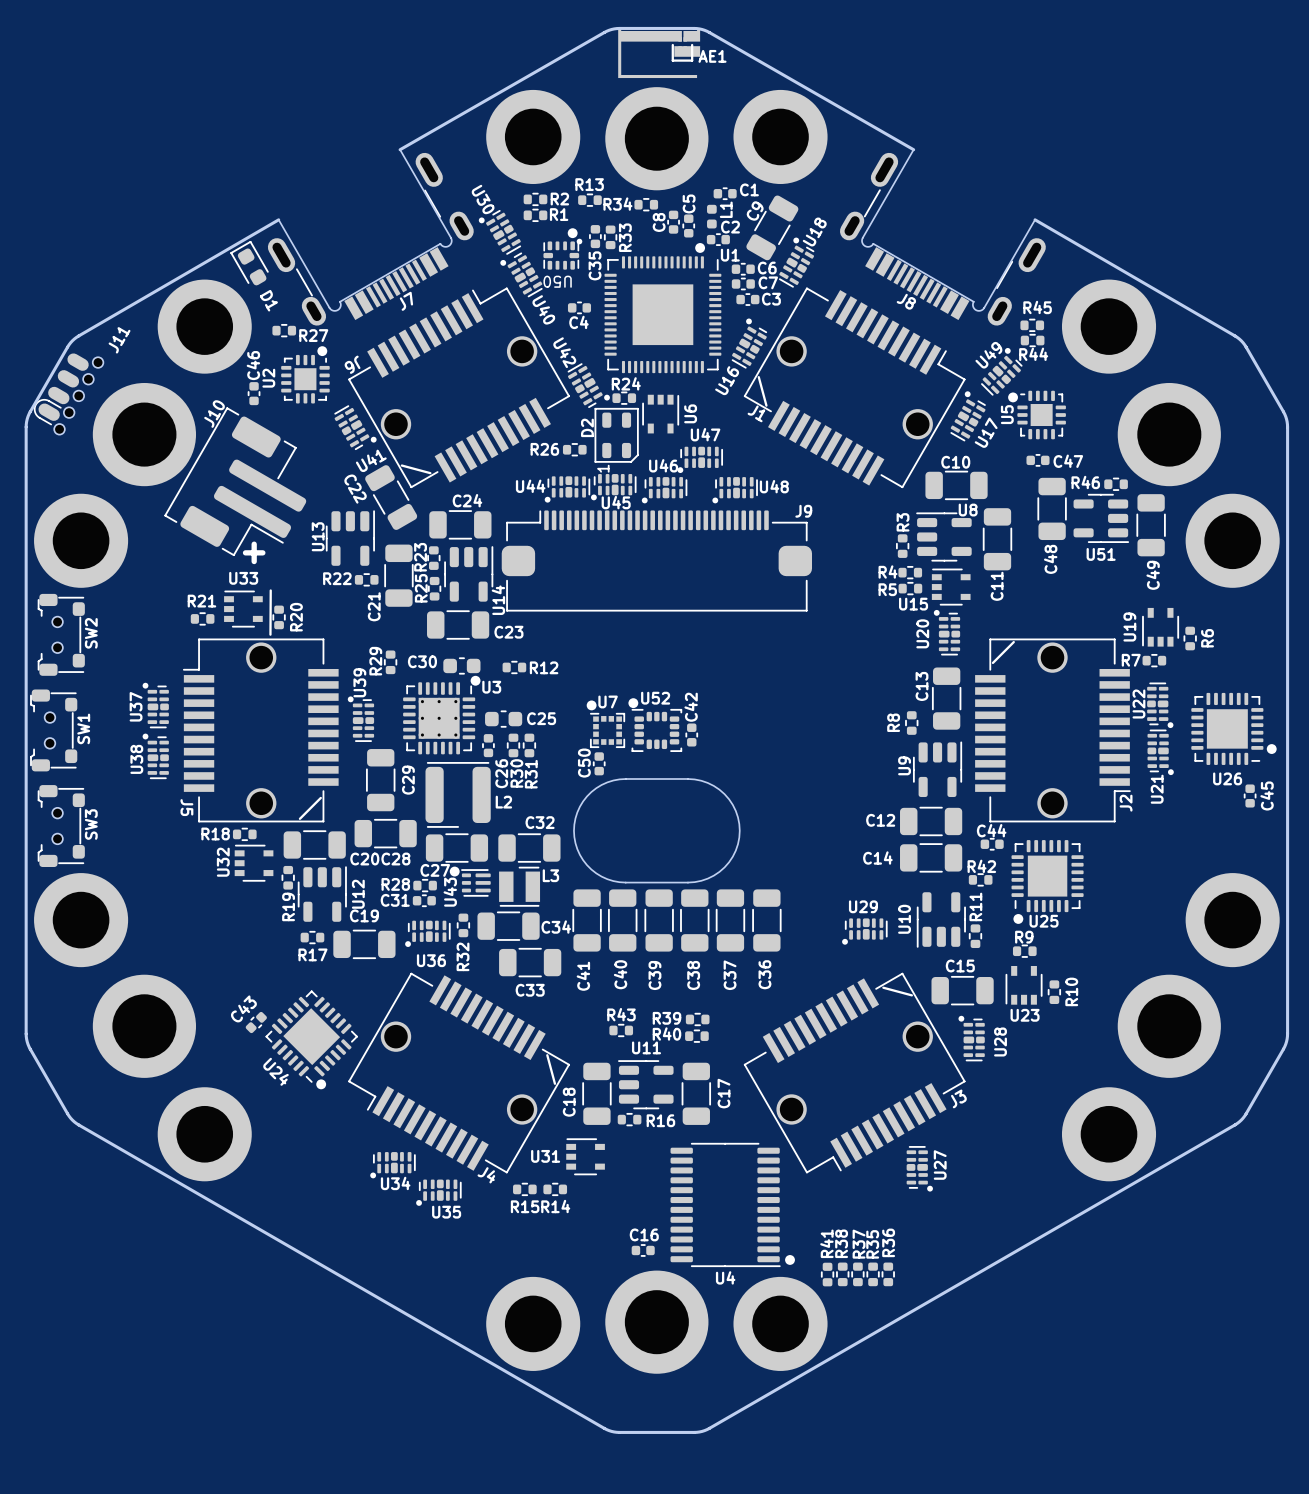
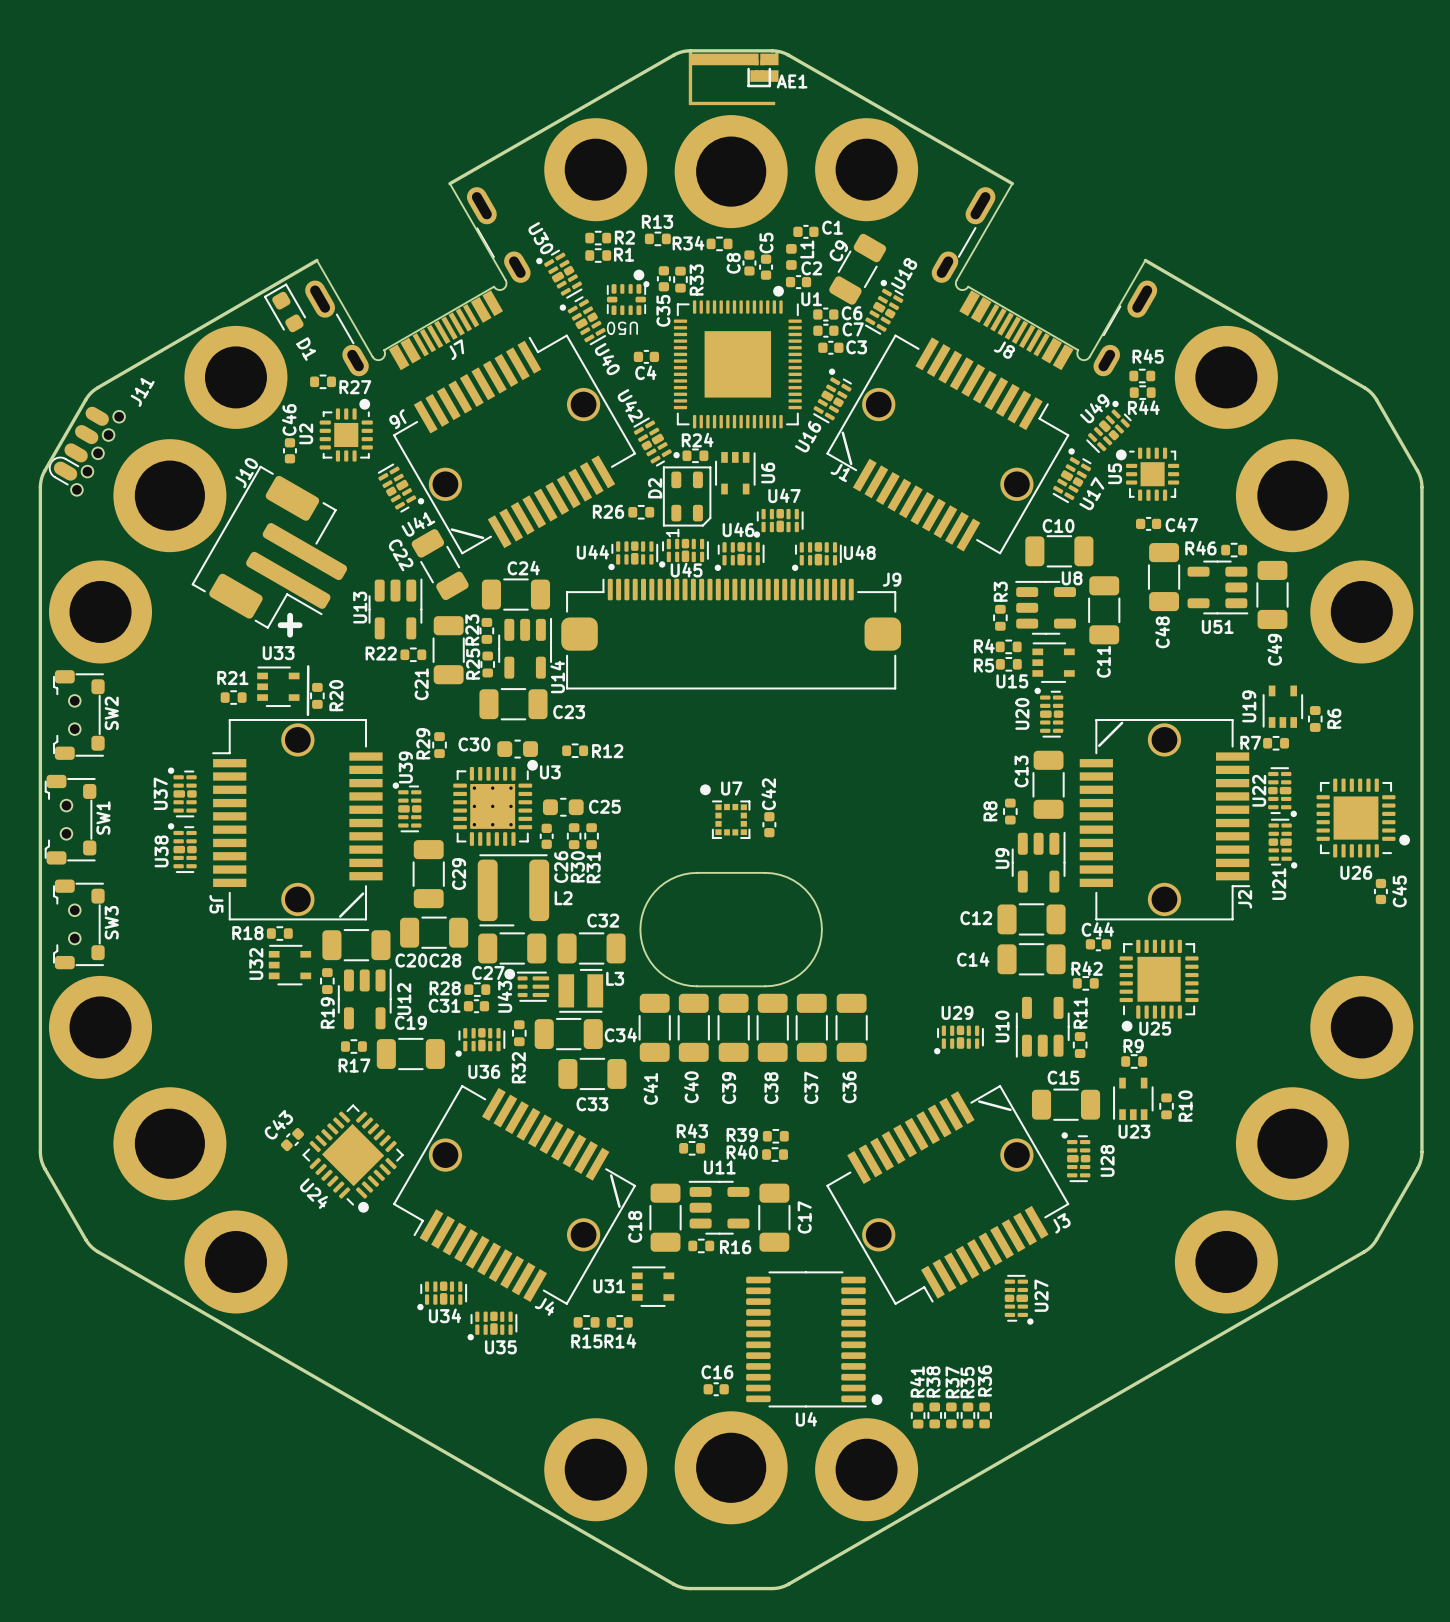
drawing: [586, 700, 597, 711] -> none
U7 position: (607, 730) -> (731, 819)
U52: (656, 730) -> none
C50: (599, 763) -> none

